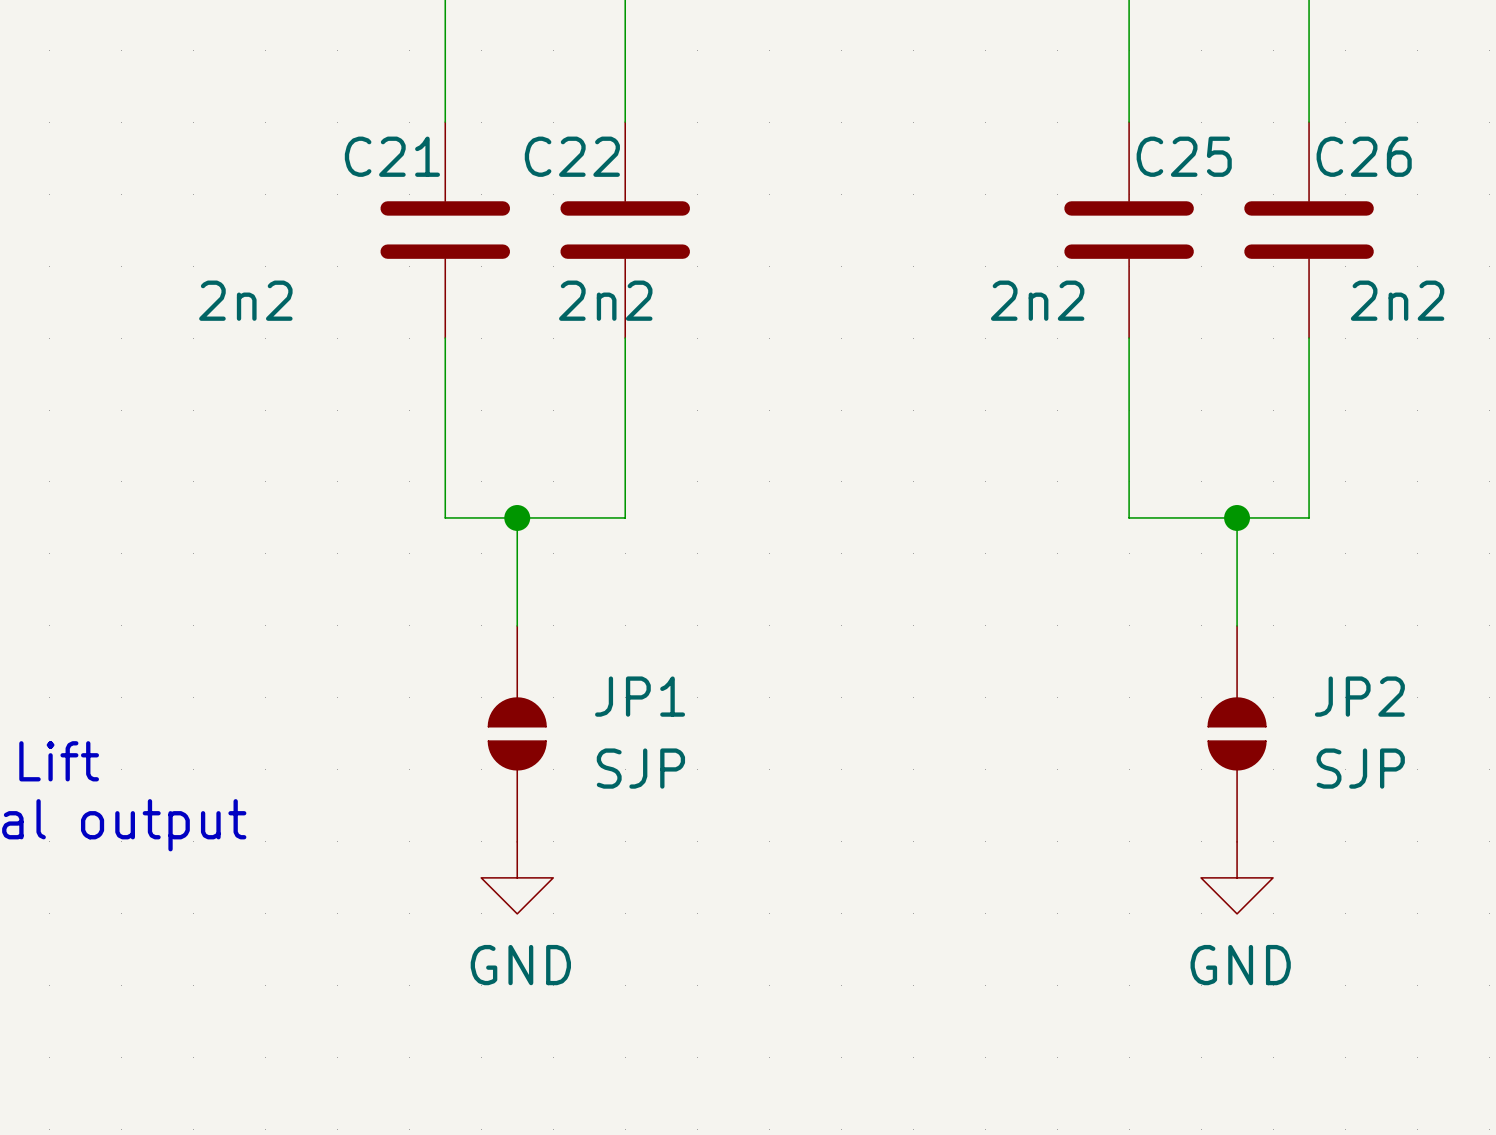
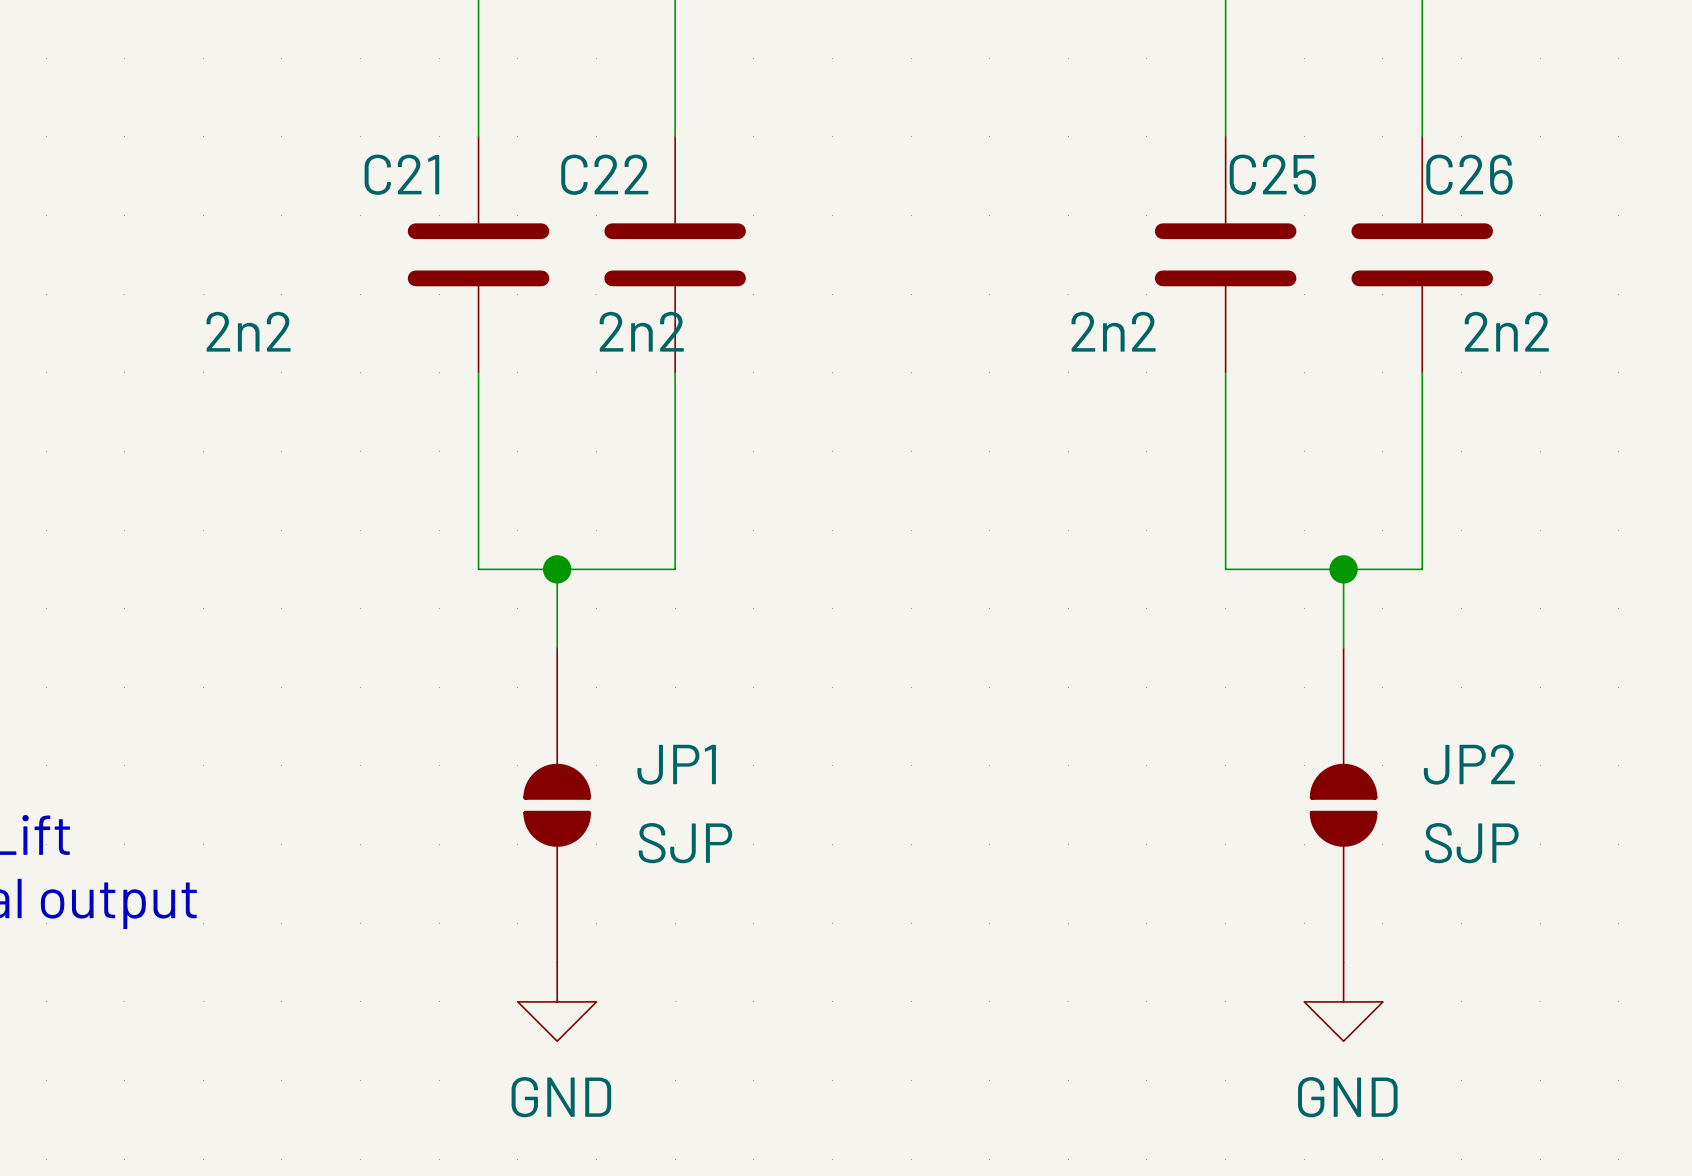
JP1 symbol: [488, 625, 547, 842] -> [523, 648, 591, 963]
JP2 symbol: [1208, 625, 1266, 842] -> [1309, 648, 1378, 963]
power symbol position: GND (517, 877) -> GND (557, 1001)
power symbol position: GND (1237, 877) -> GND (1343, 1001)

